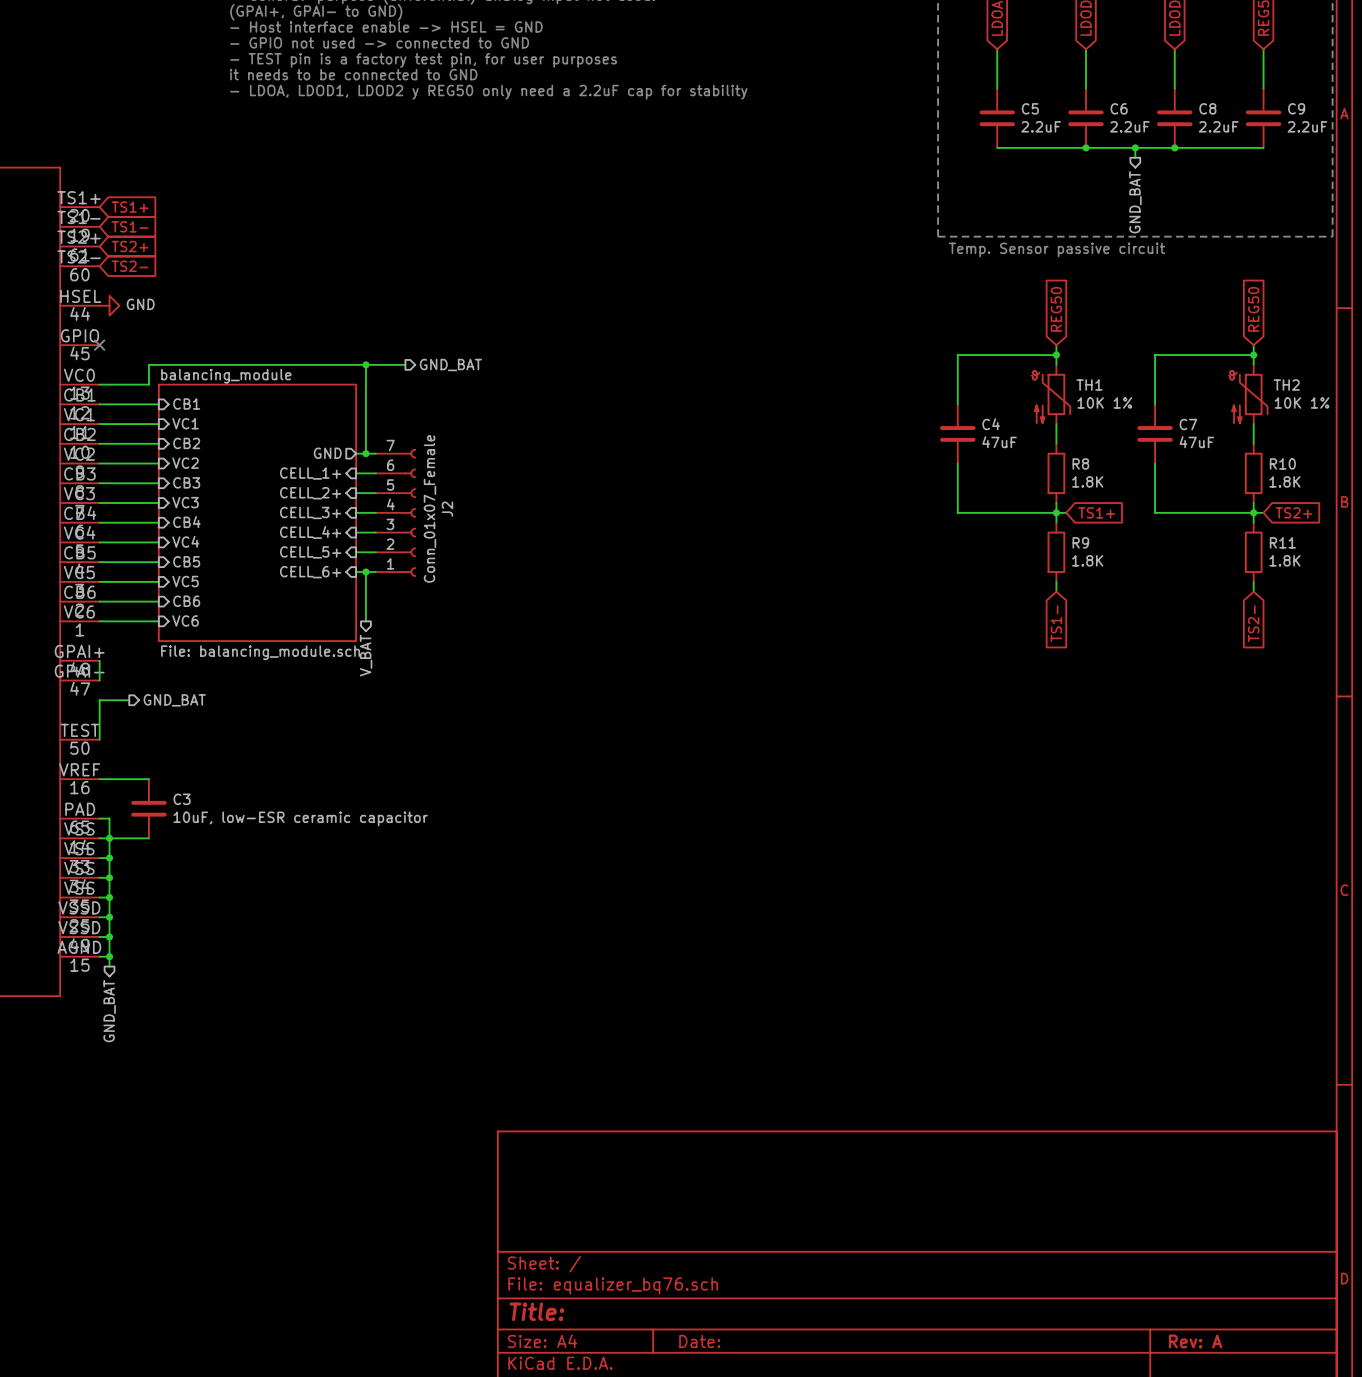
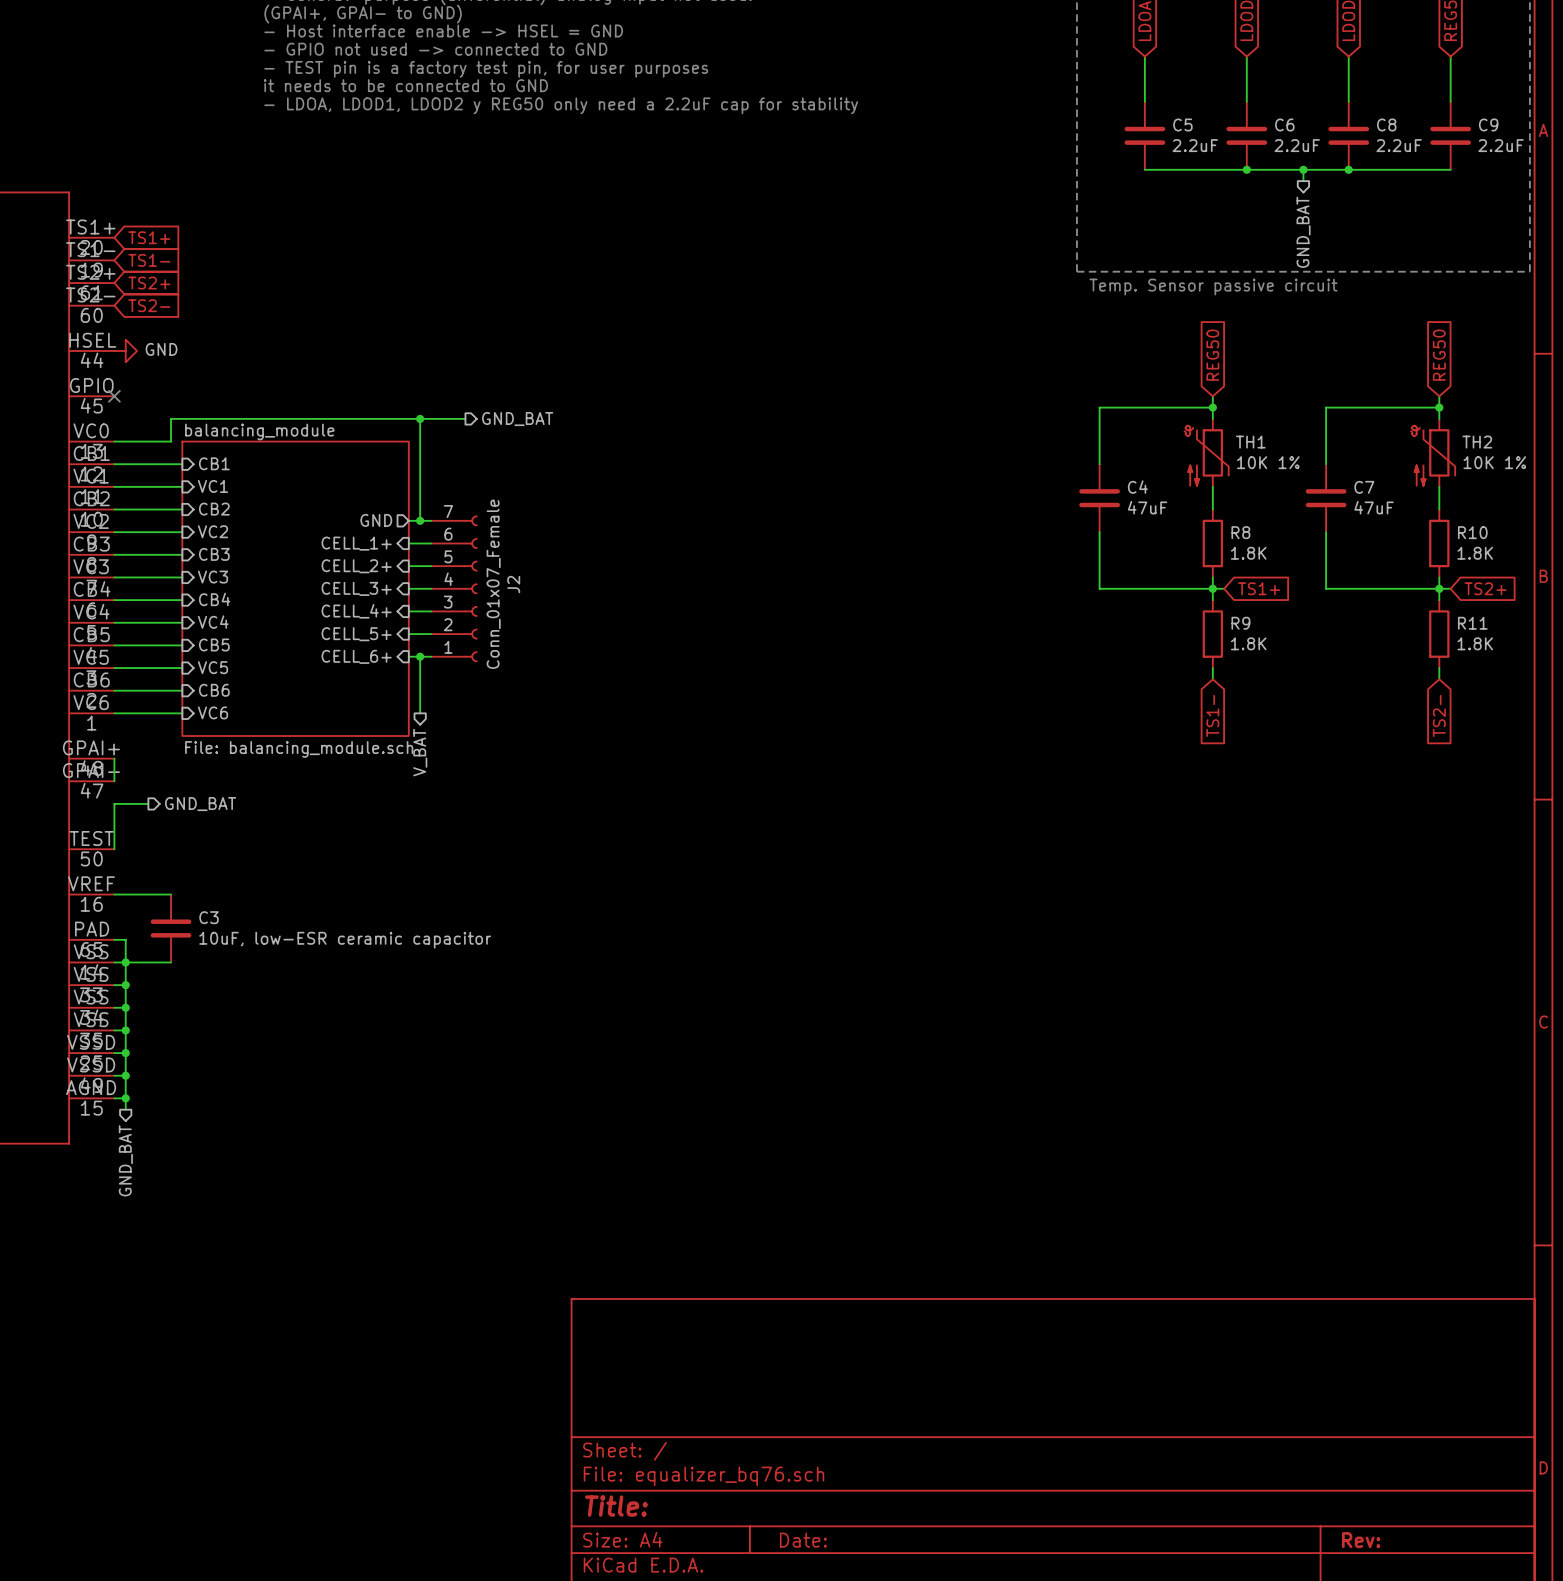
title block: Rev: A (1195, 1341) -> Rev: (1361, 1540)

